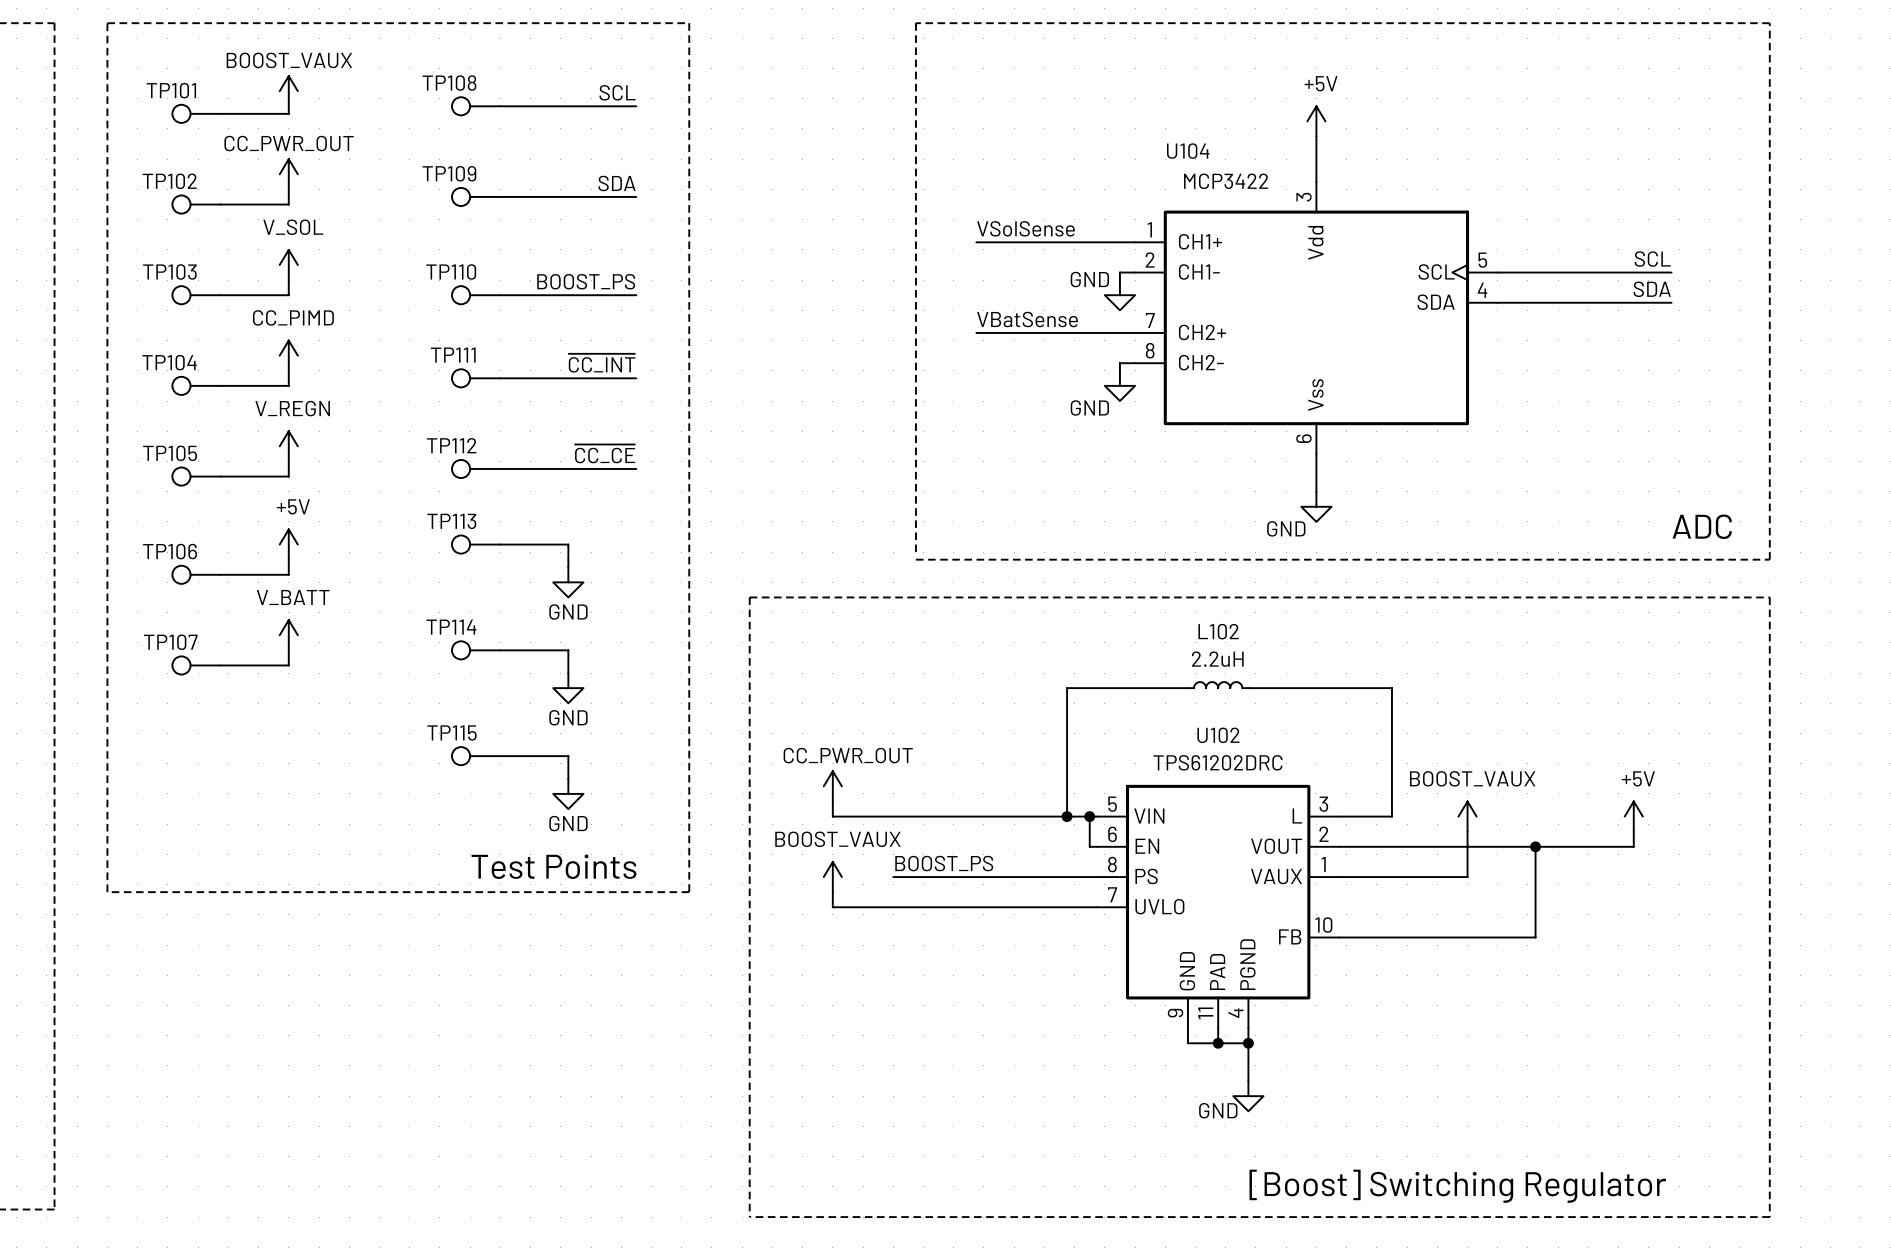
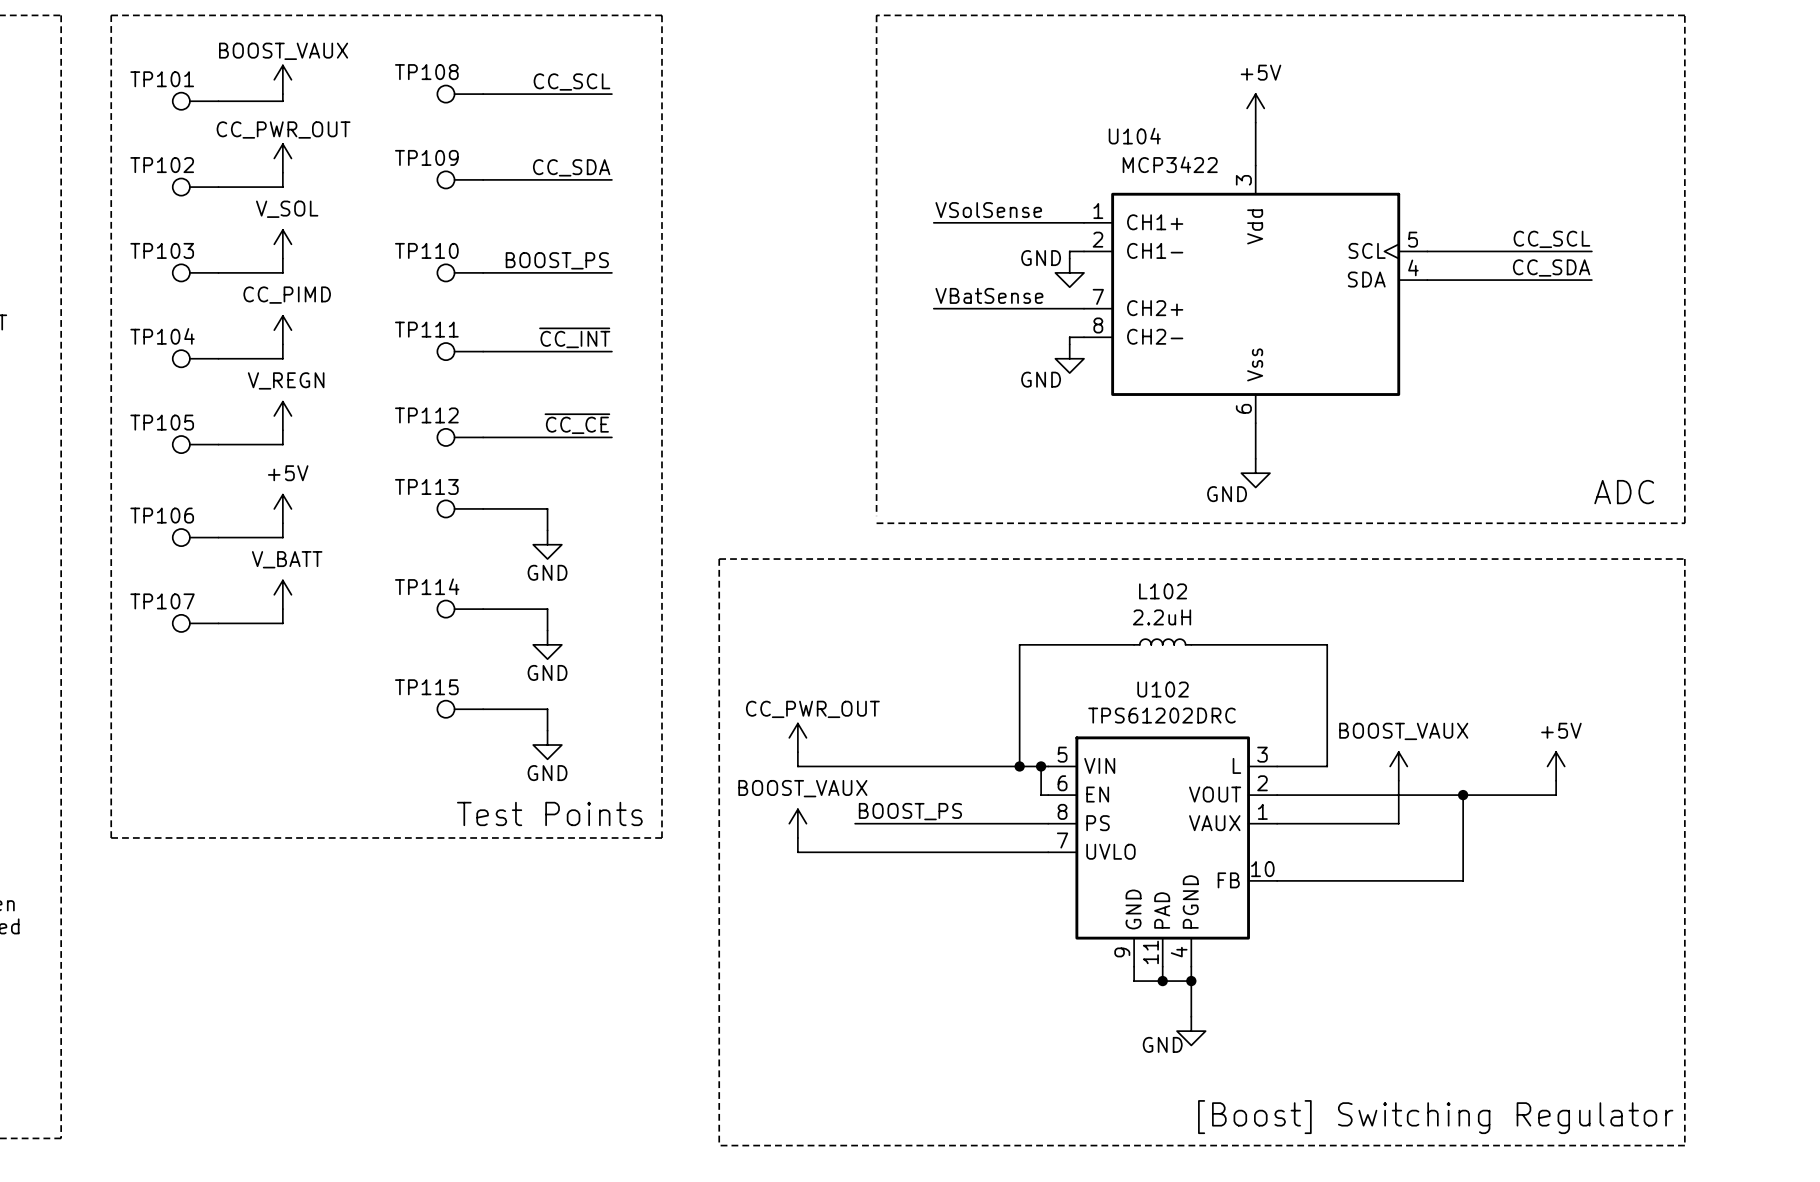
label: SCL (617, 92) -> CC_SCL (571, 82)
label: SDA (617, 183) -> CC_SDA (571, 167)
label: SCL (1652, 259) -> CC_SCL (1551, 239)
label: SDA (1652, 289) -> CC_SDA (1551, 267)

